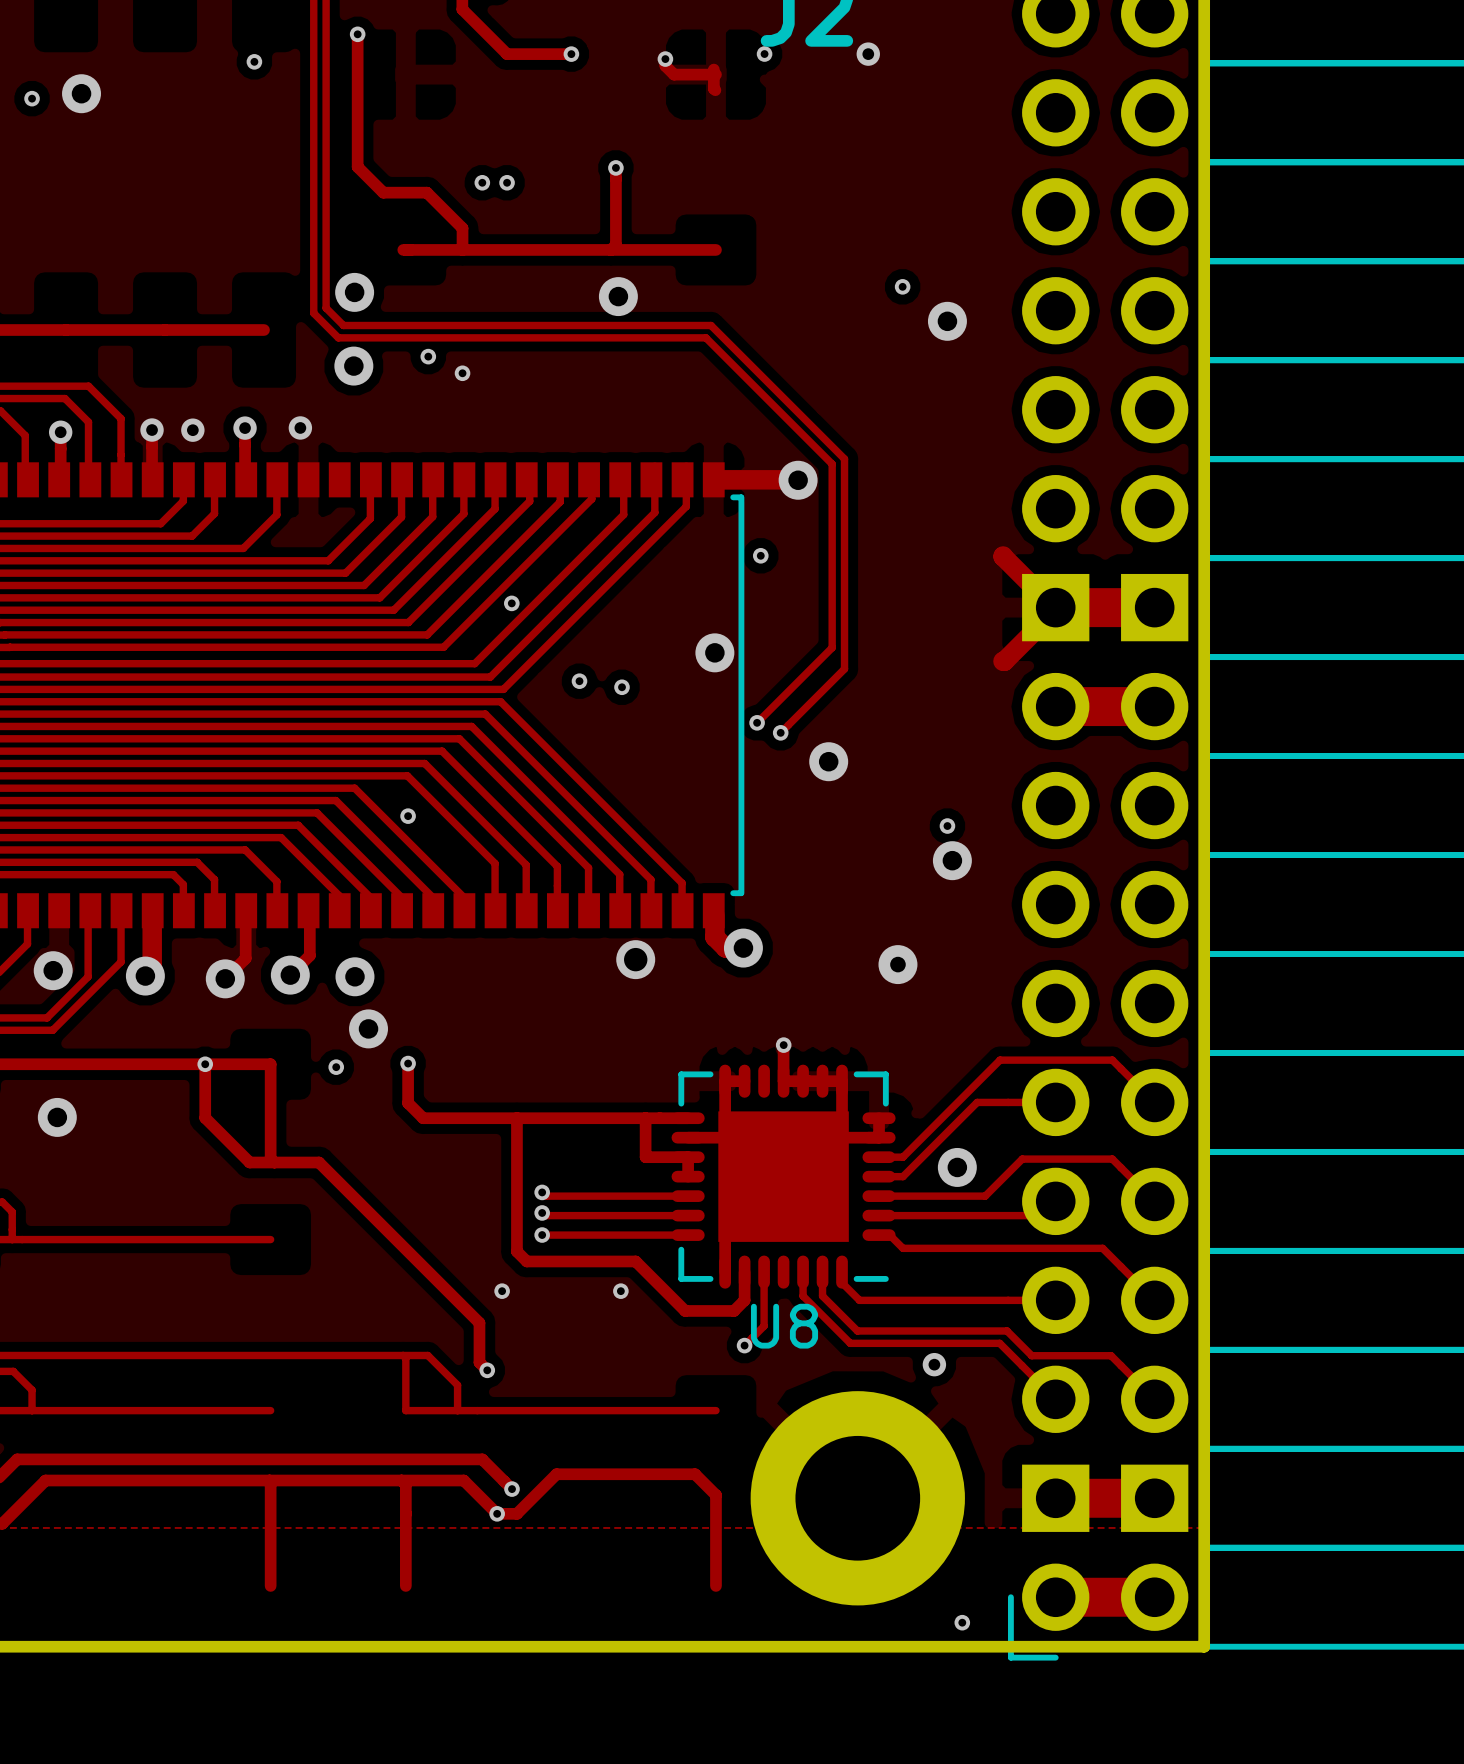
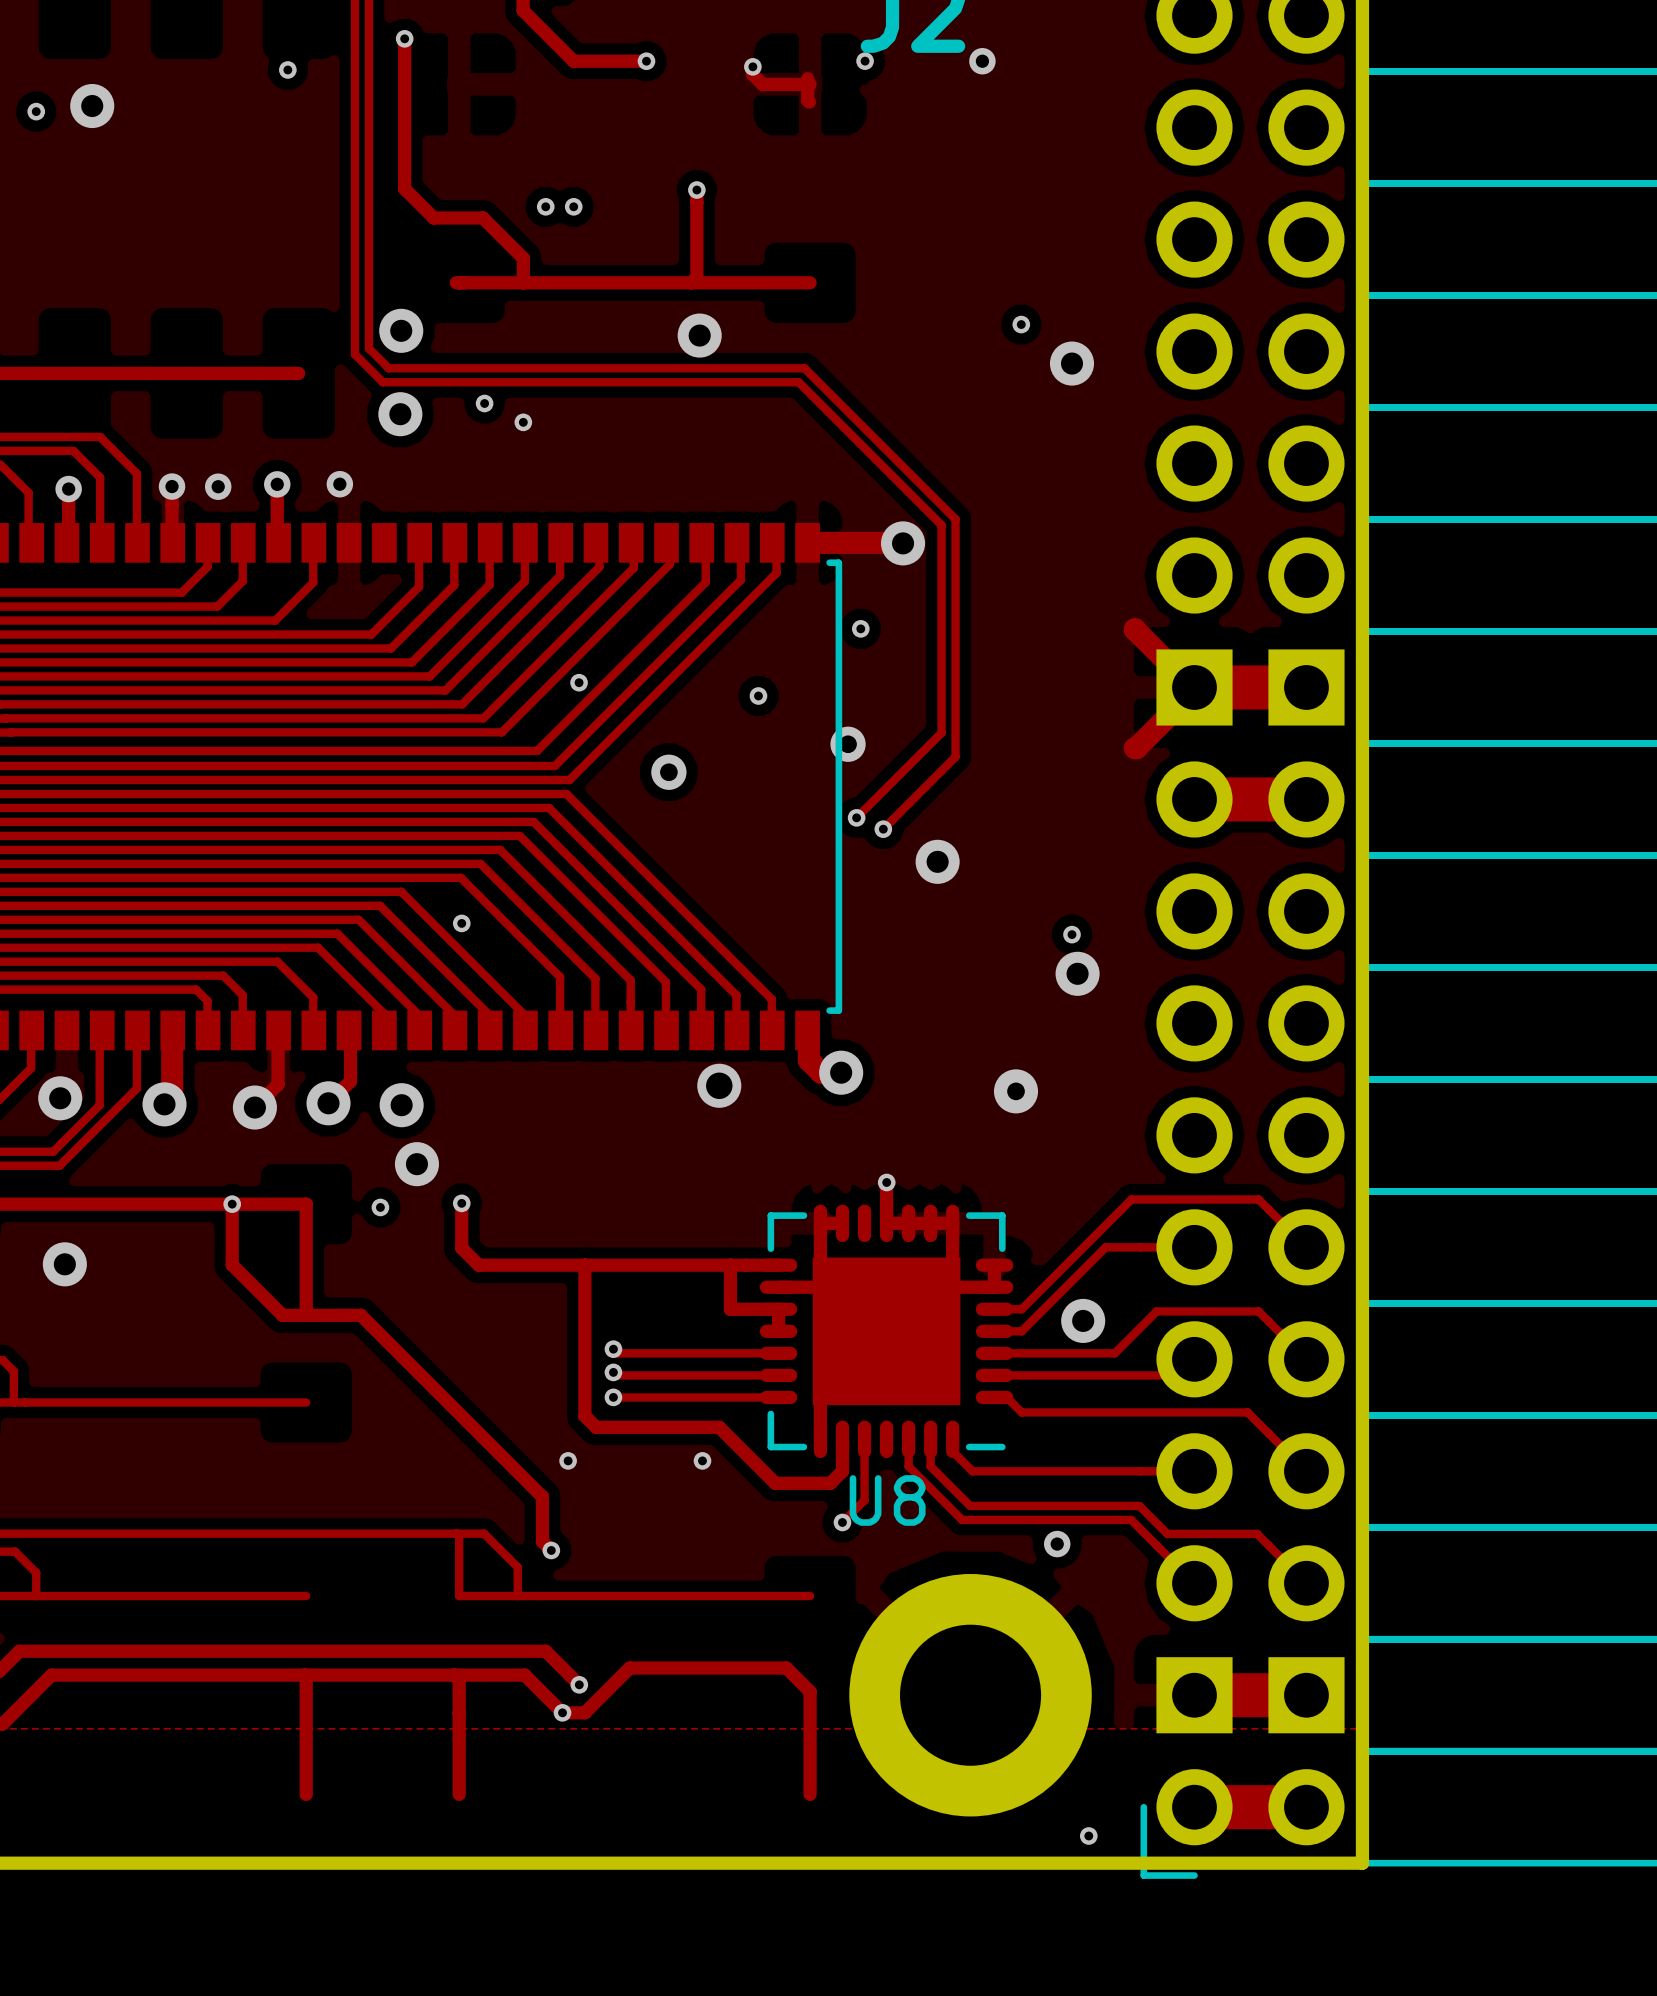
via: none -> (758, 695)
via position: (714, 652) -> (848, 744)
via size: [571, 673, 588, 689] -> [651, 754, 687, 790]
via: (622, 687) -> none

